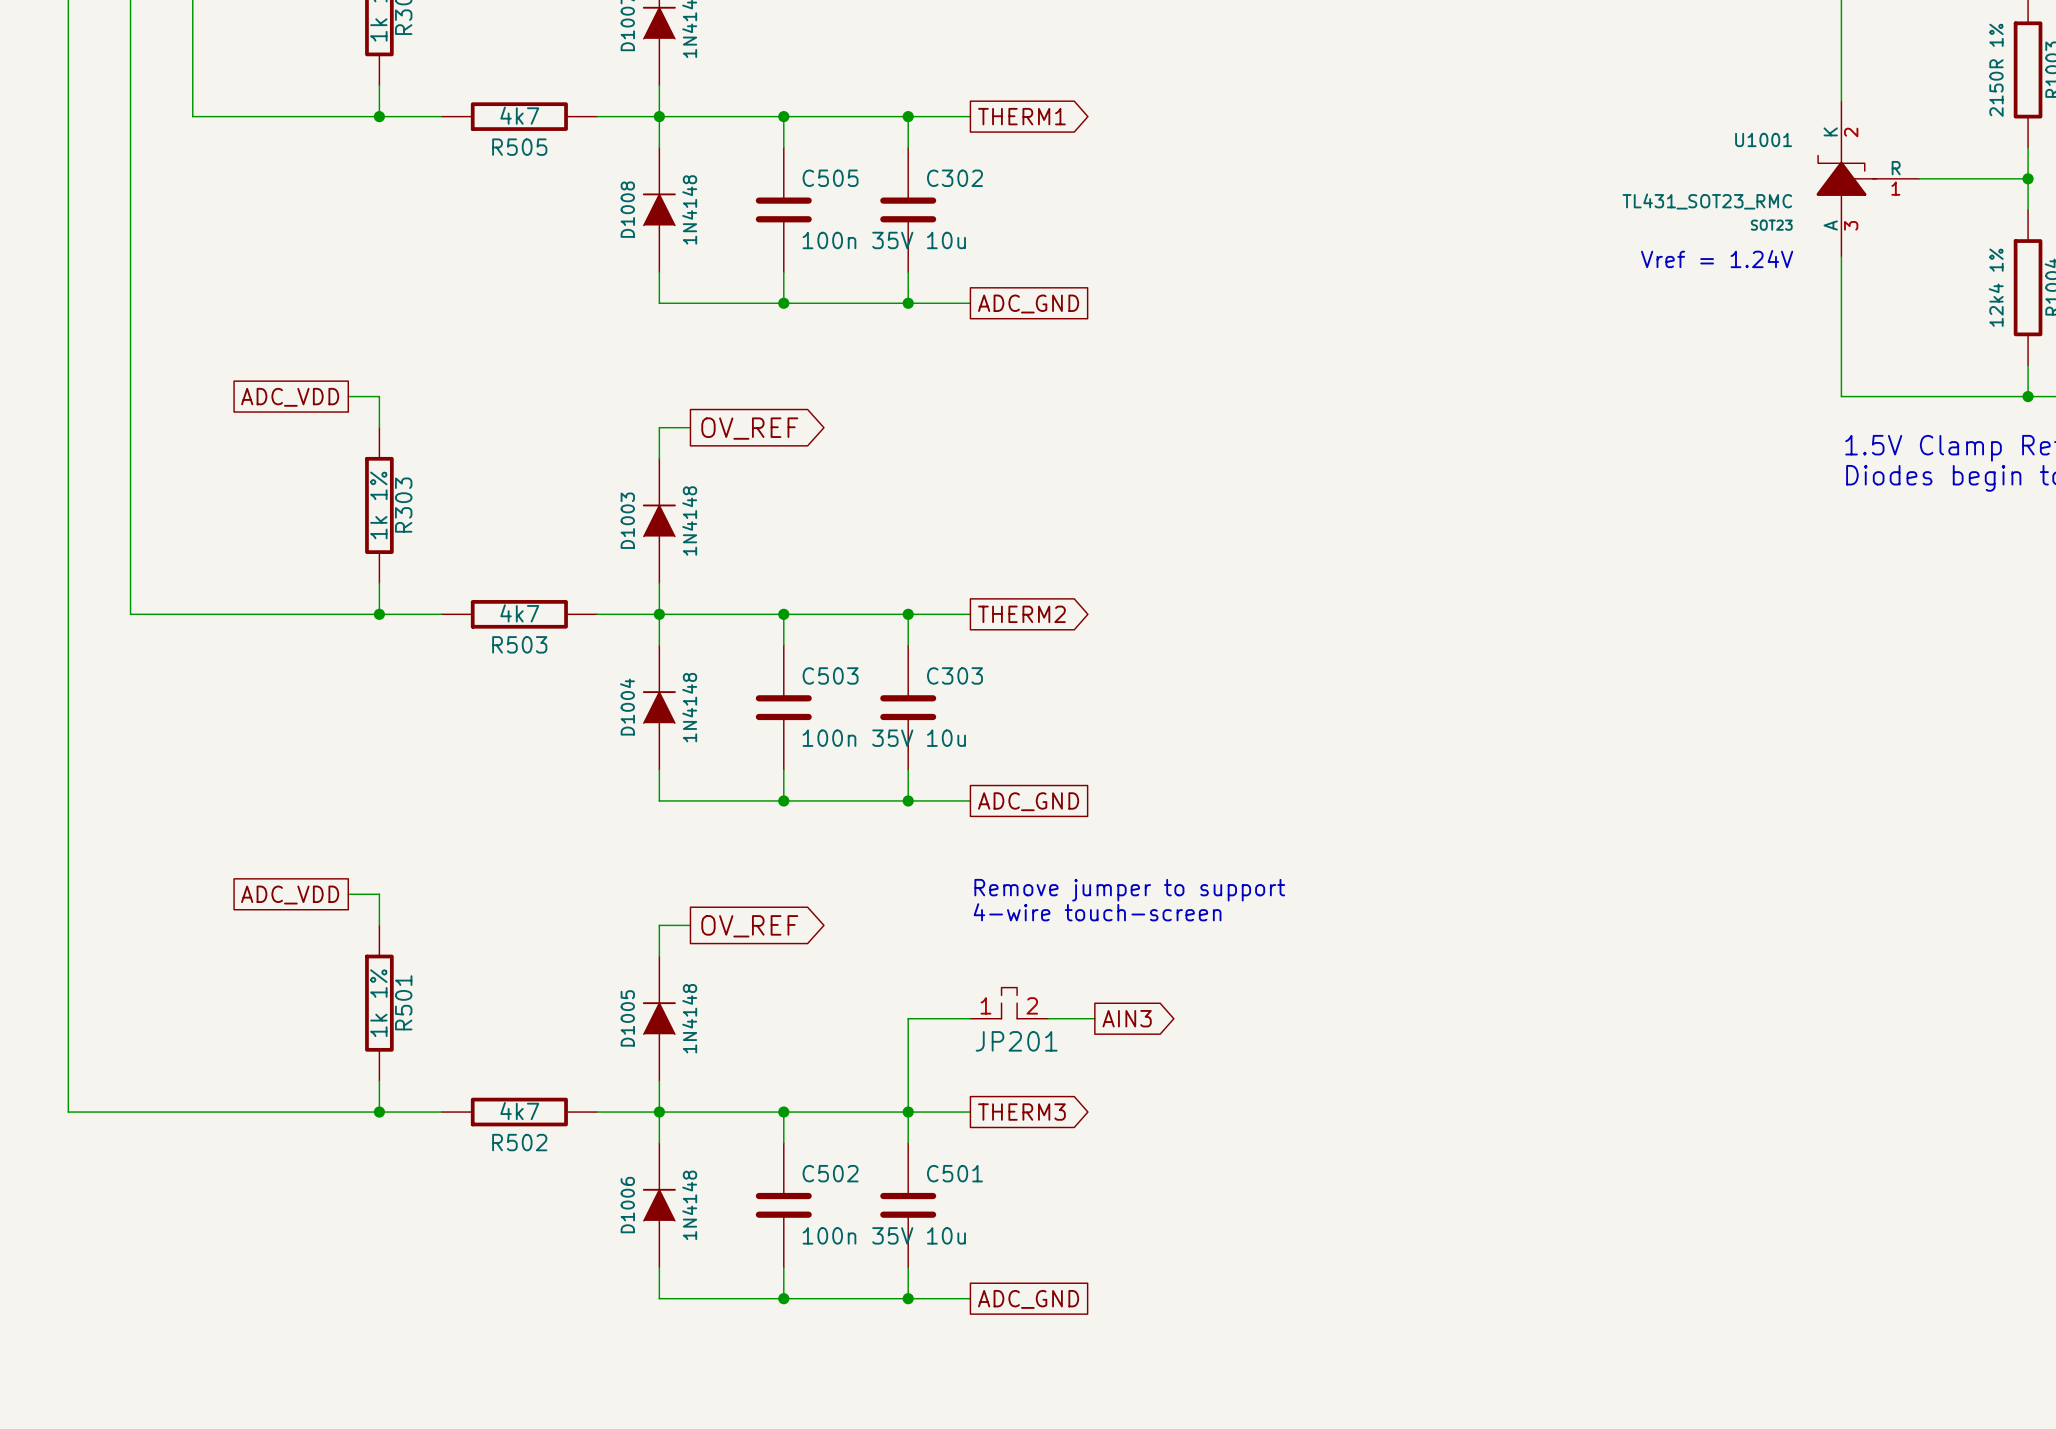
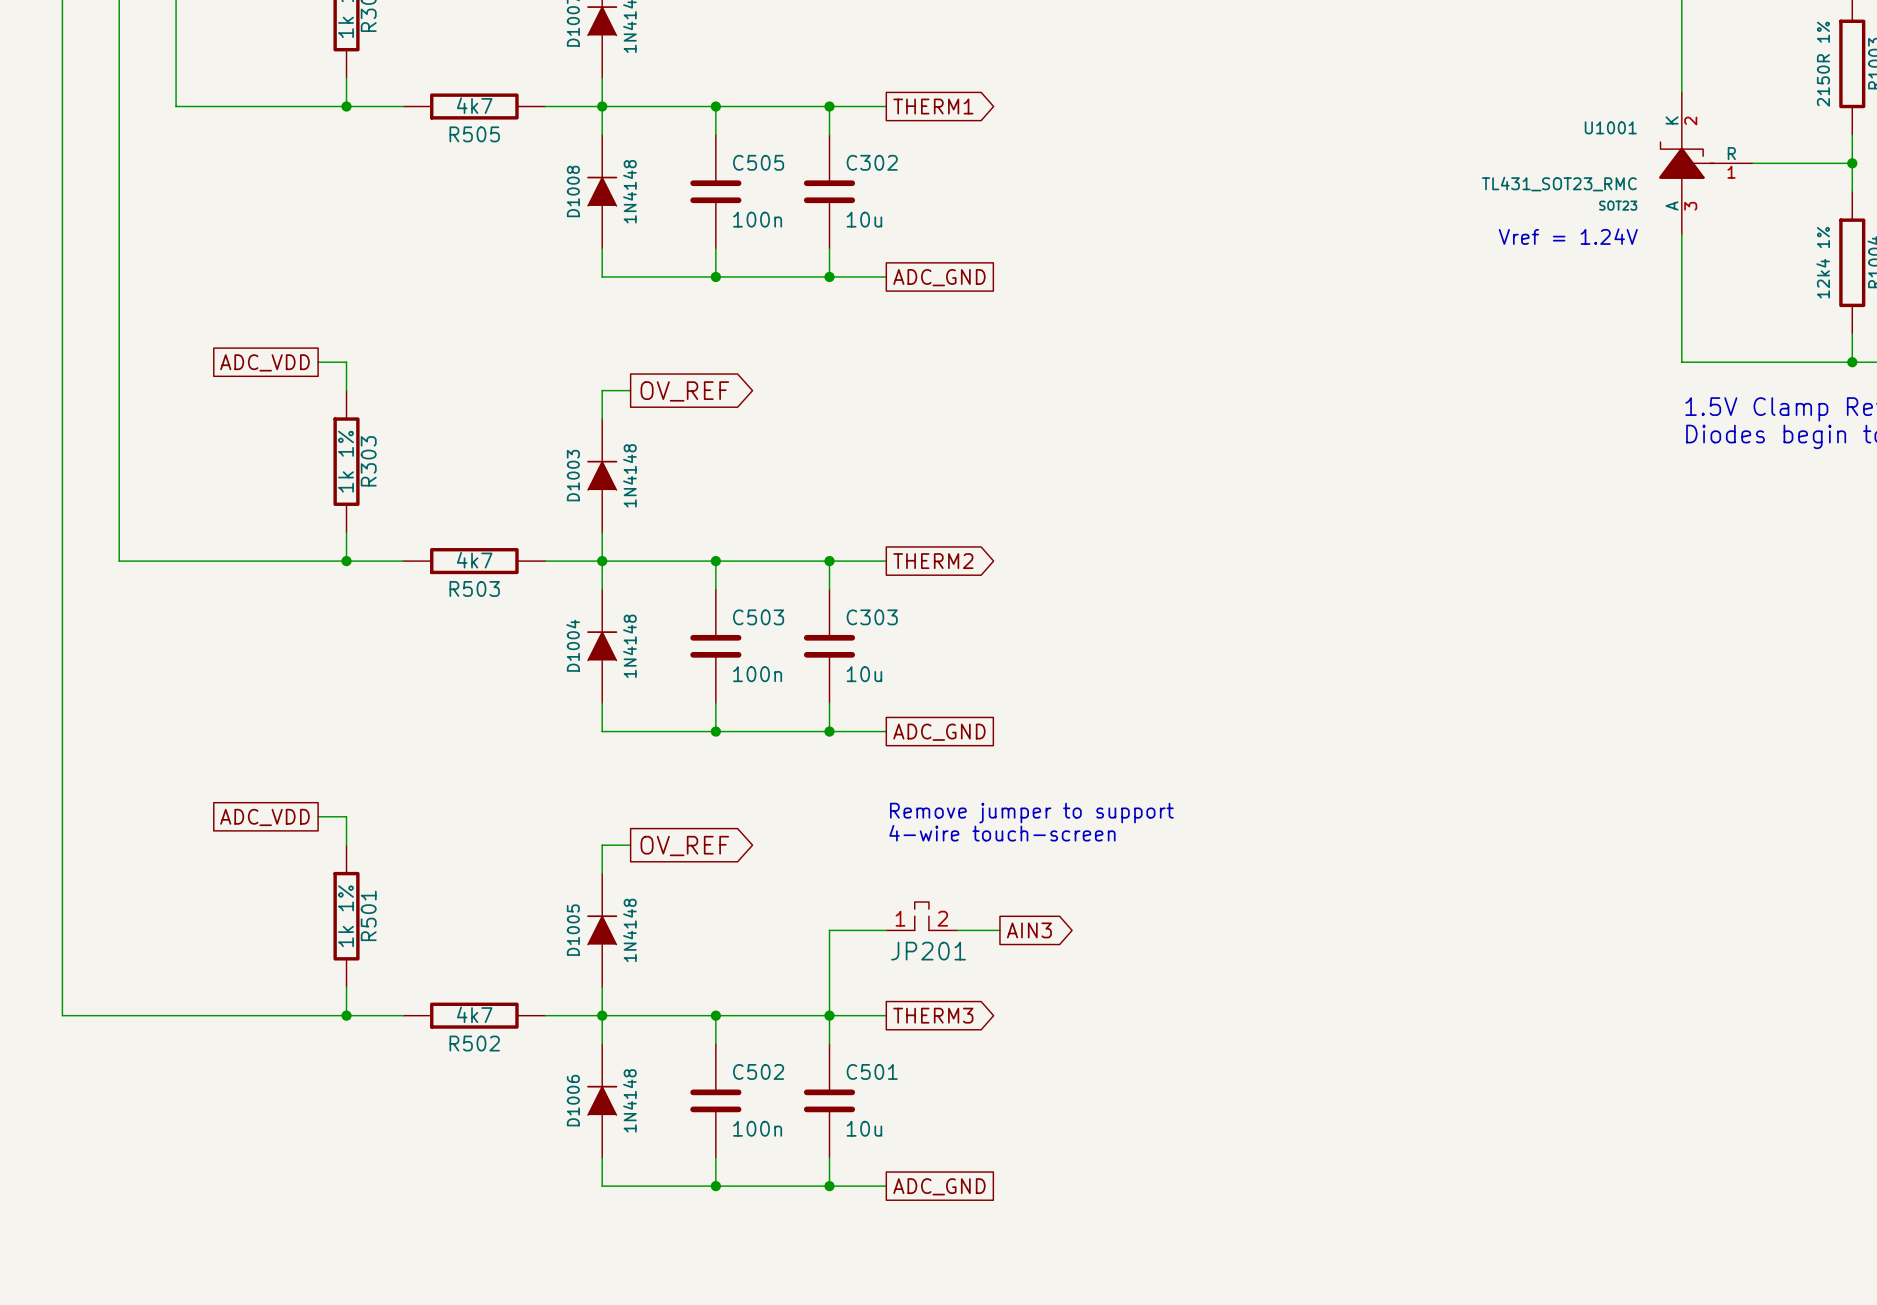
C505 value: 100n 35V (857, 240) -> 100n (757, 219)
C503 value: 100n 35V (857, 738) -> 100n (757, 674)
C502 value: 100n 35V (857, 1235) -> 100n (757, 1128)

